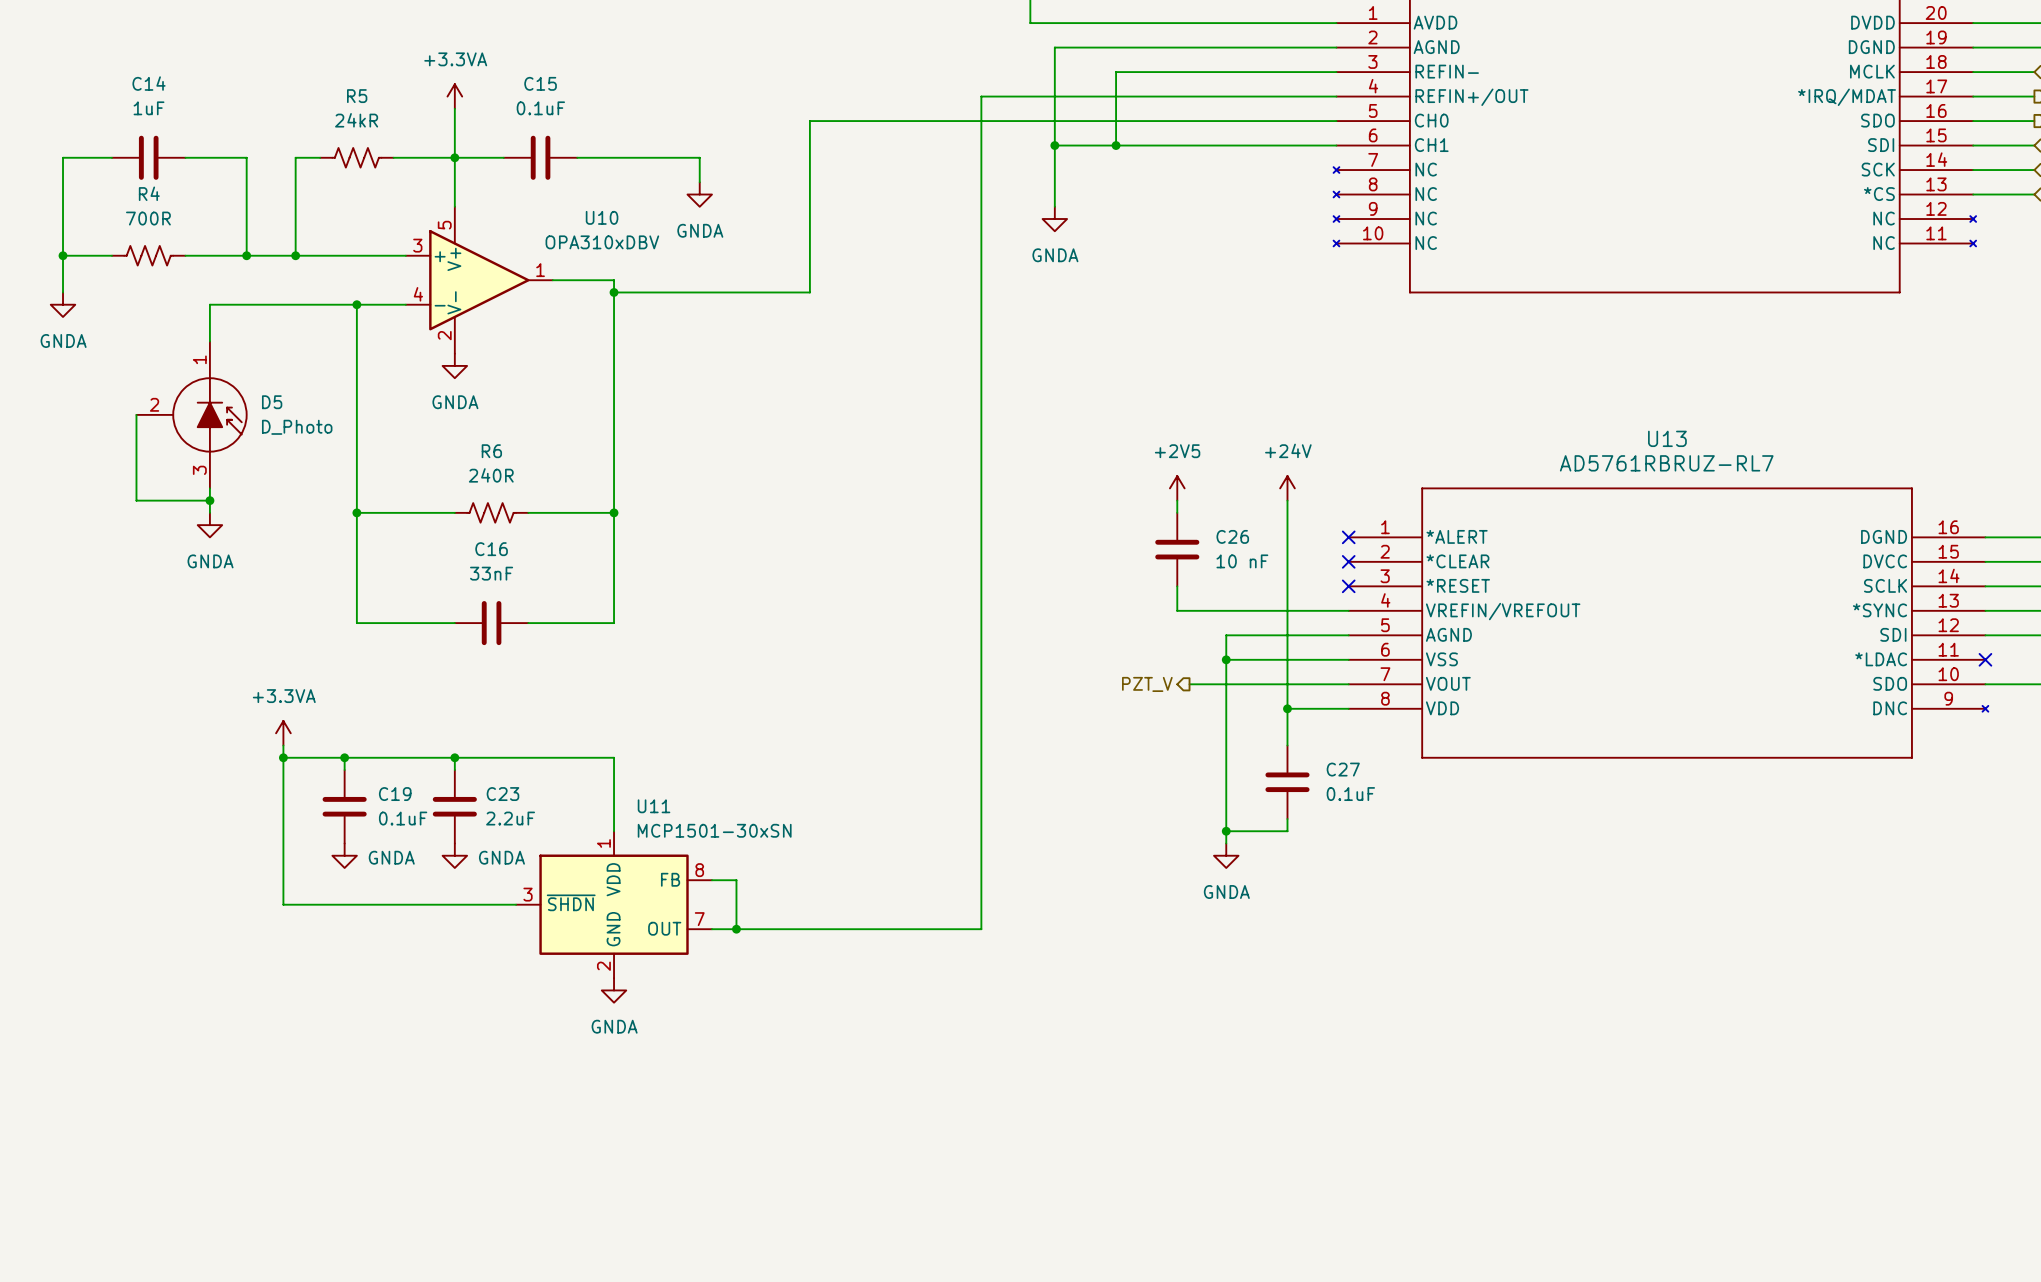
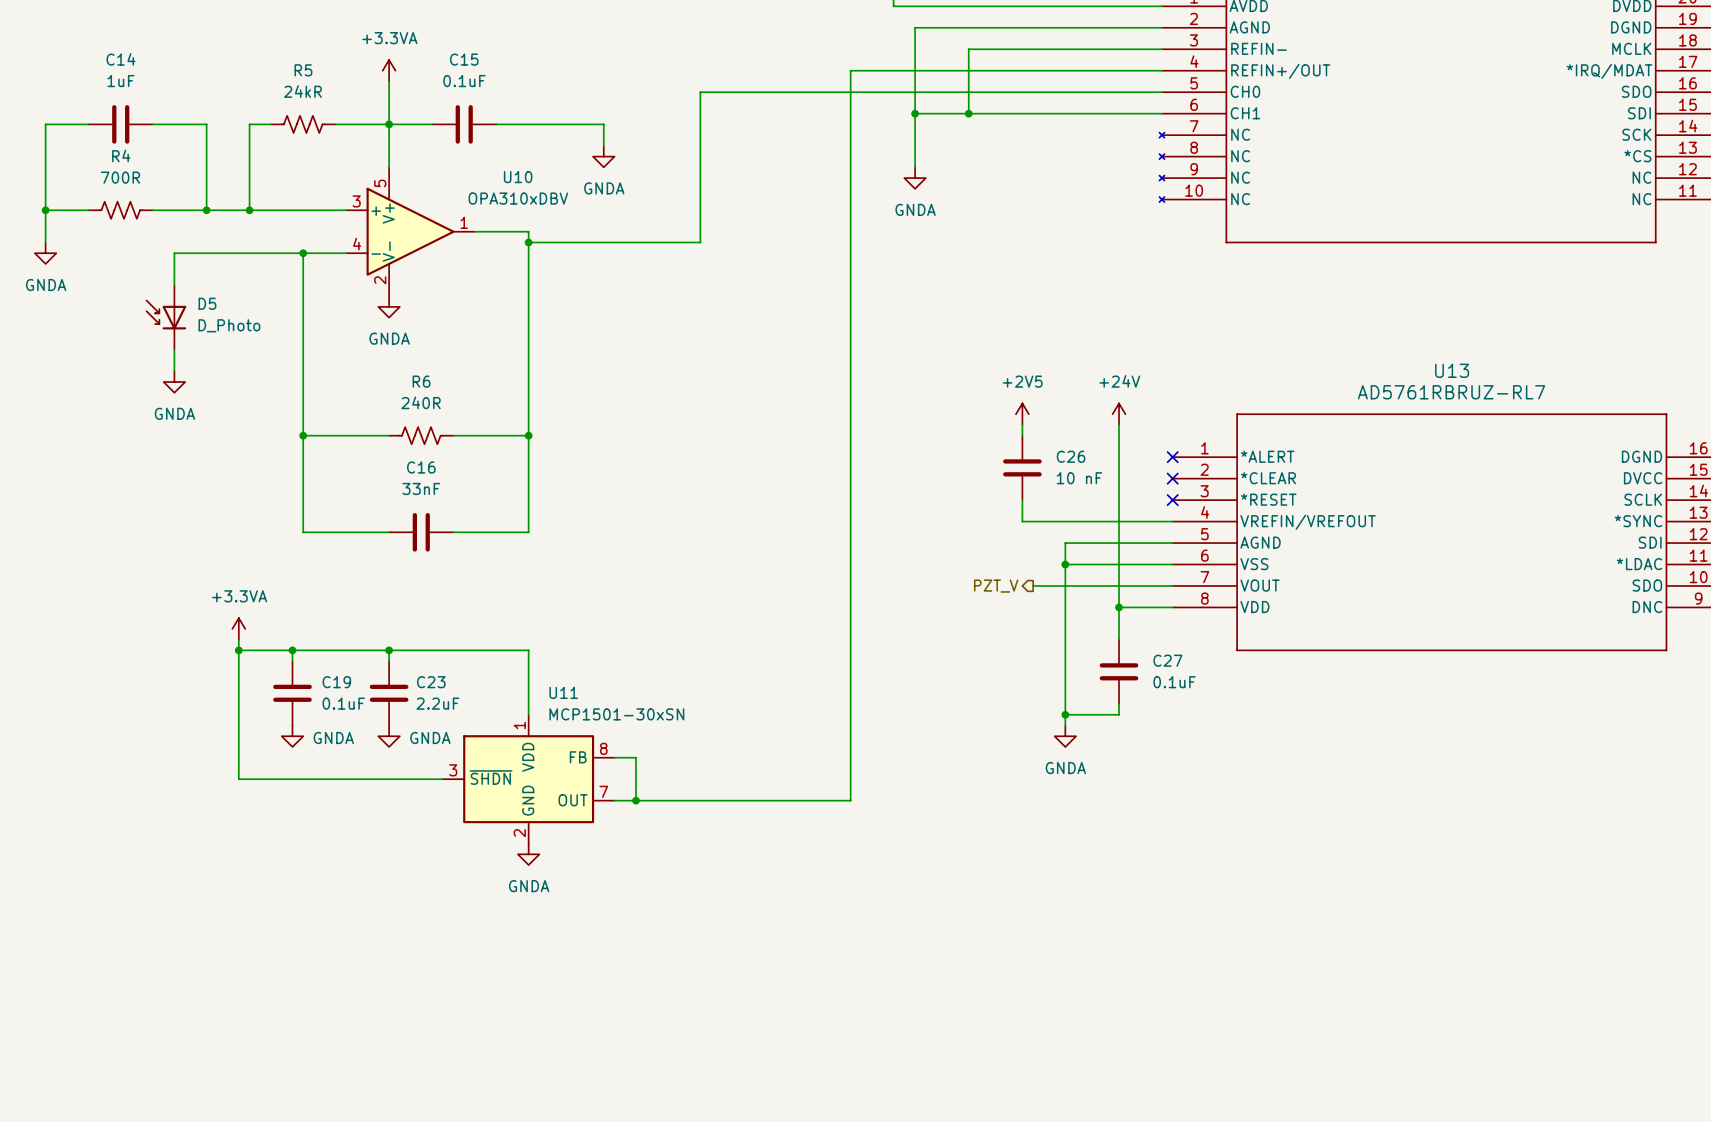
D5 symbol: [136, 341, 247, 489] -> [146, 285, 187, 350]
D5 name position: D5 (272, 402) -> D5 (207, 303)
wire: (136, 414) (136, 500) (209, 500) -> none
D5 value position: D_Photo (297, 427) -> D_Photo (229, 325)
junction: (209, 500) -> none
power symbol position: GNDA (209, 525) -> GNDA (174, 382)

